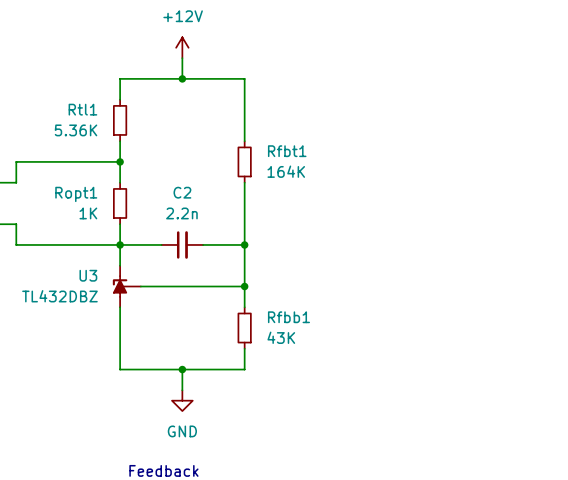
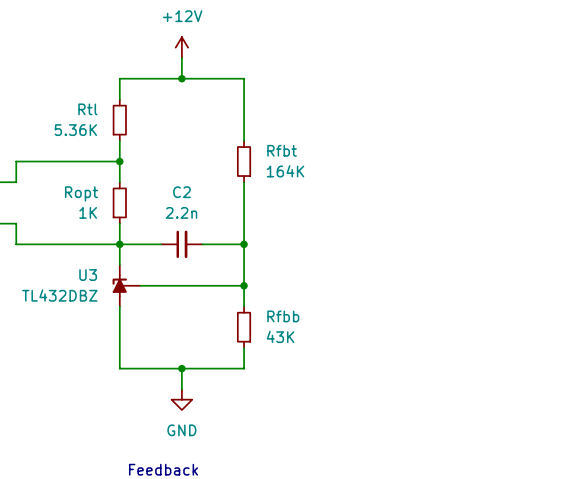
Rtl1 name: Rtl1 (82, 109) -> Rtl (87, 109)
Rfbt1 name: Rfbt1 (287, 151) -> Rfbt (282, 150)
Ropt1 name: Ropt1 (76, 194) -> Ropt (81, 193)
Rfbb1 name: Rfbb1 (288, 317) -> Rfbb (283, 316)

